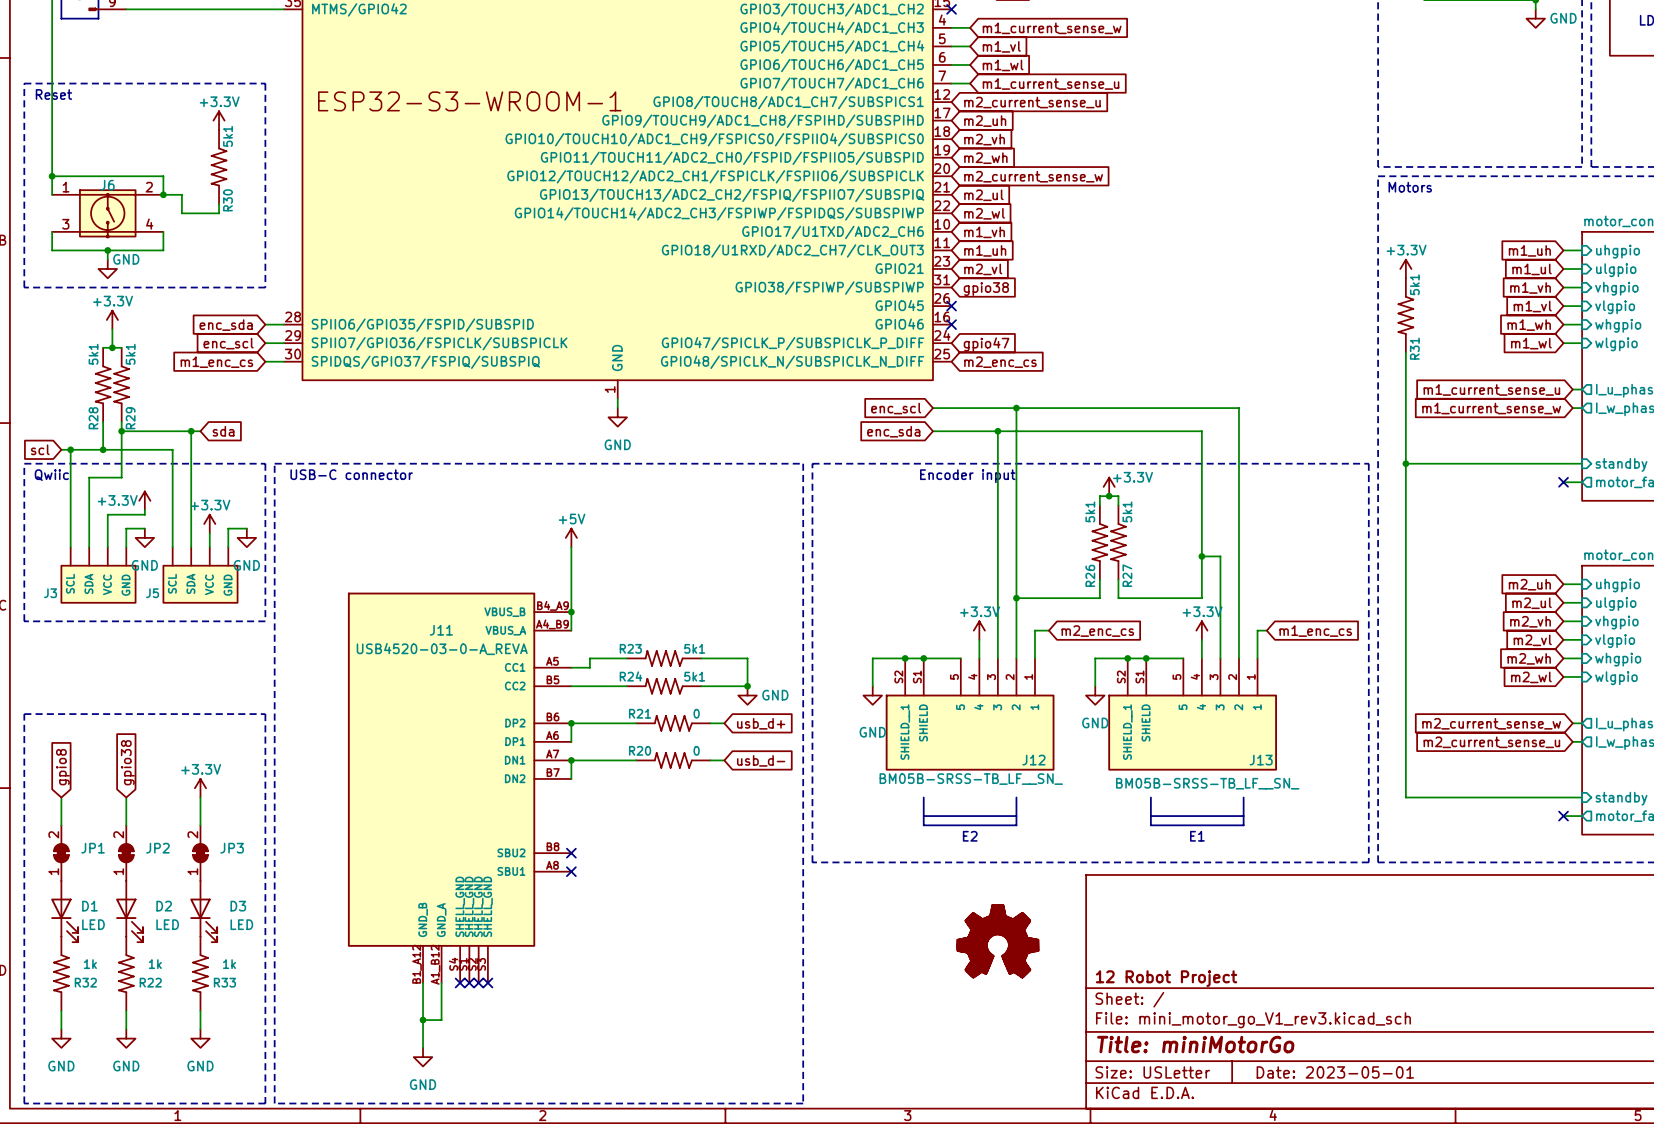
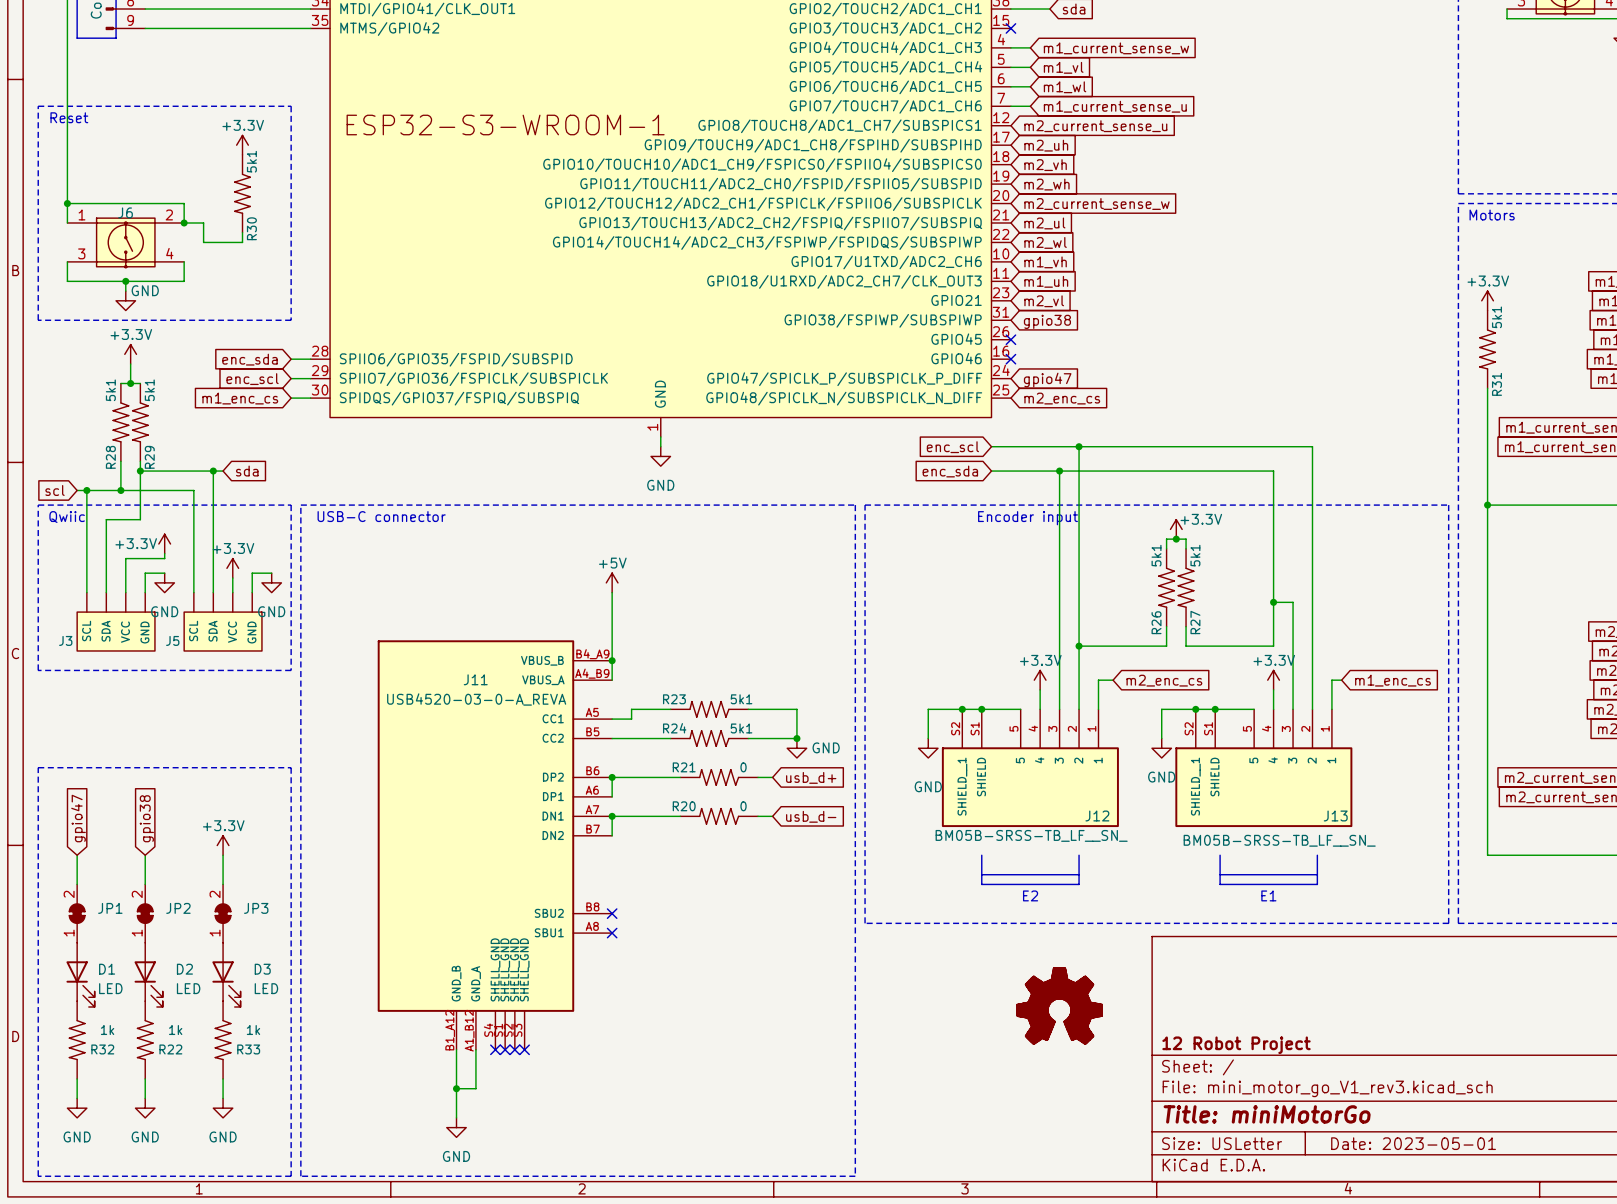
global label: gpio8 (62, 767) -> gpio47 (78, 818)

